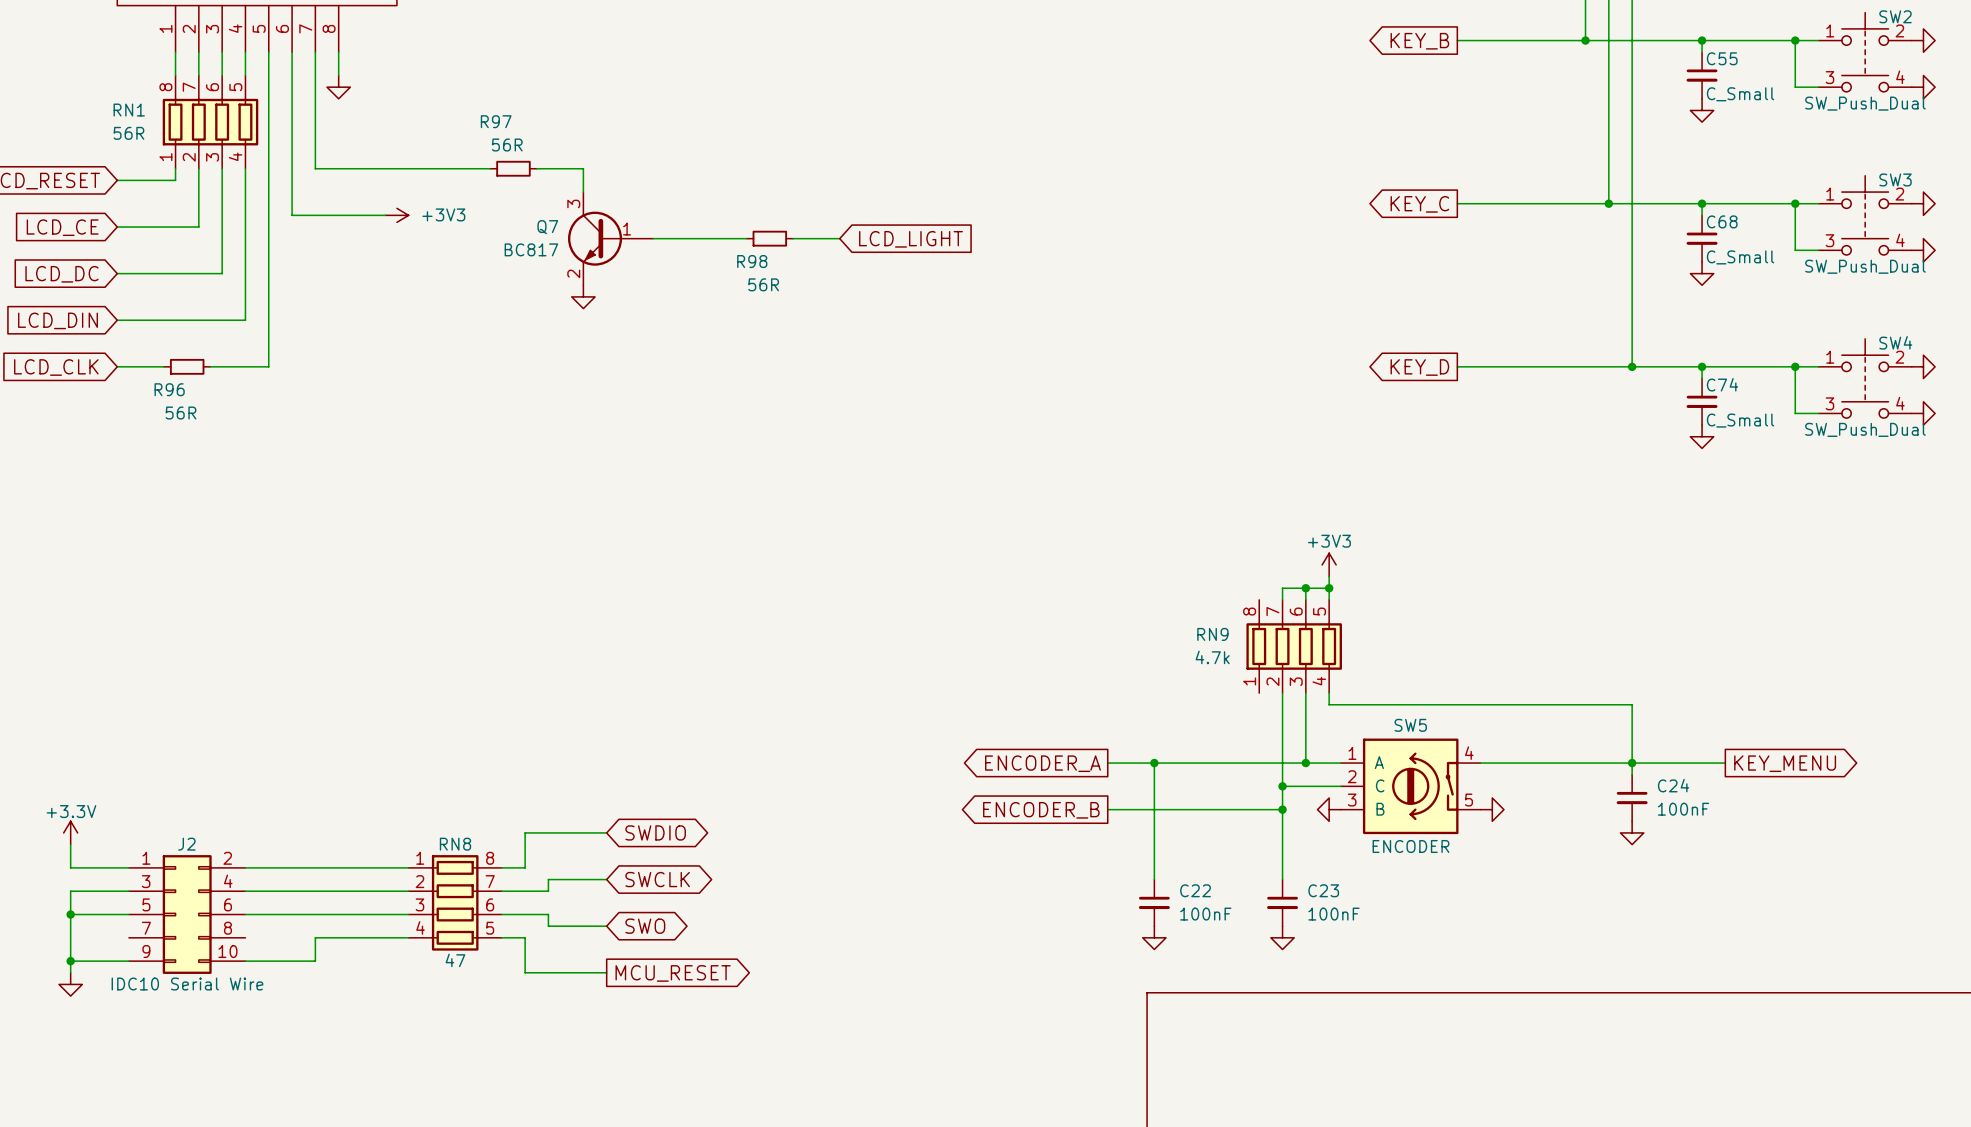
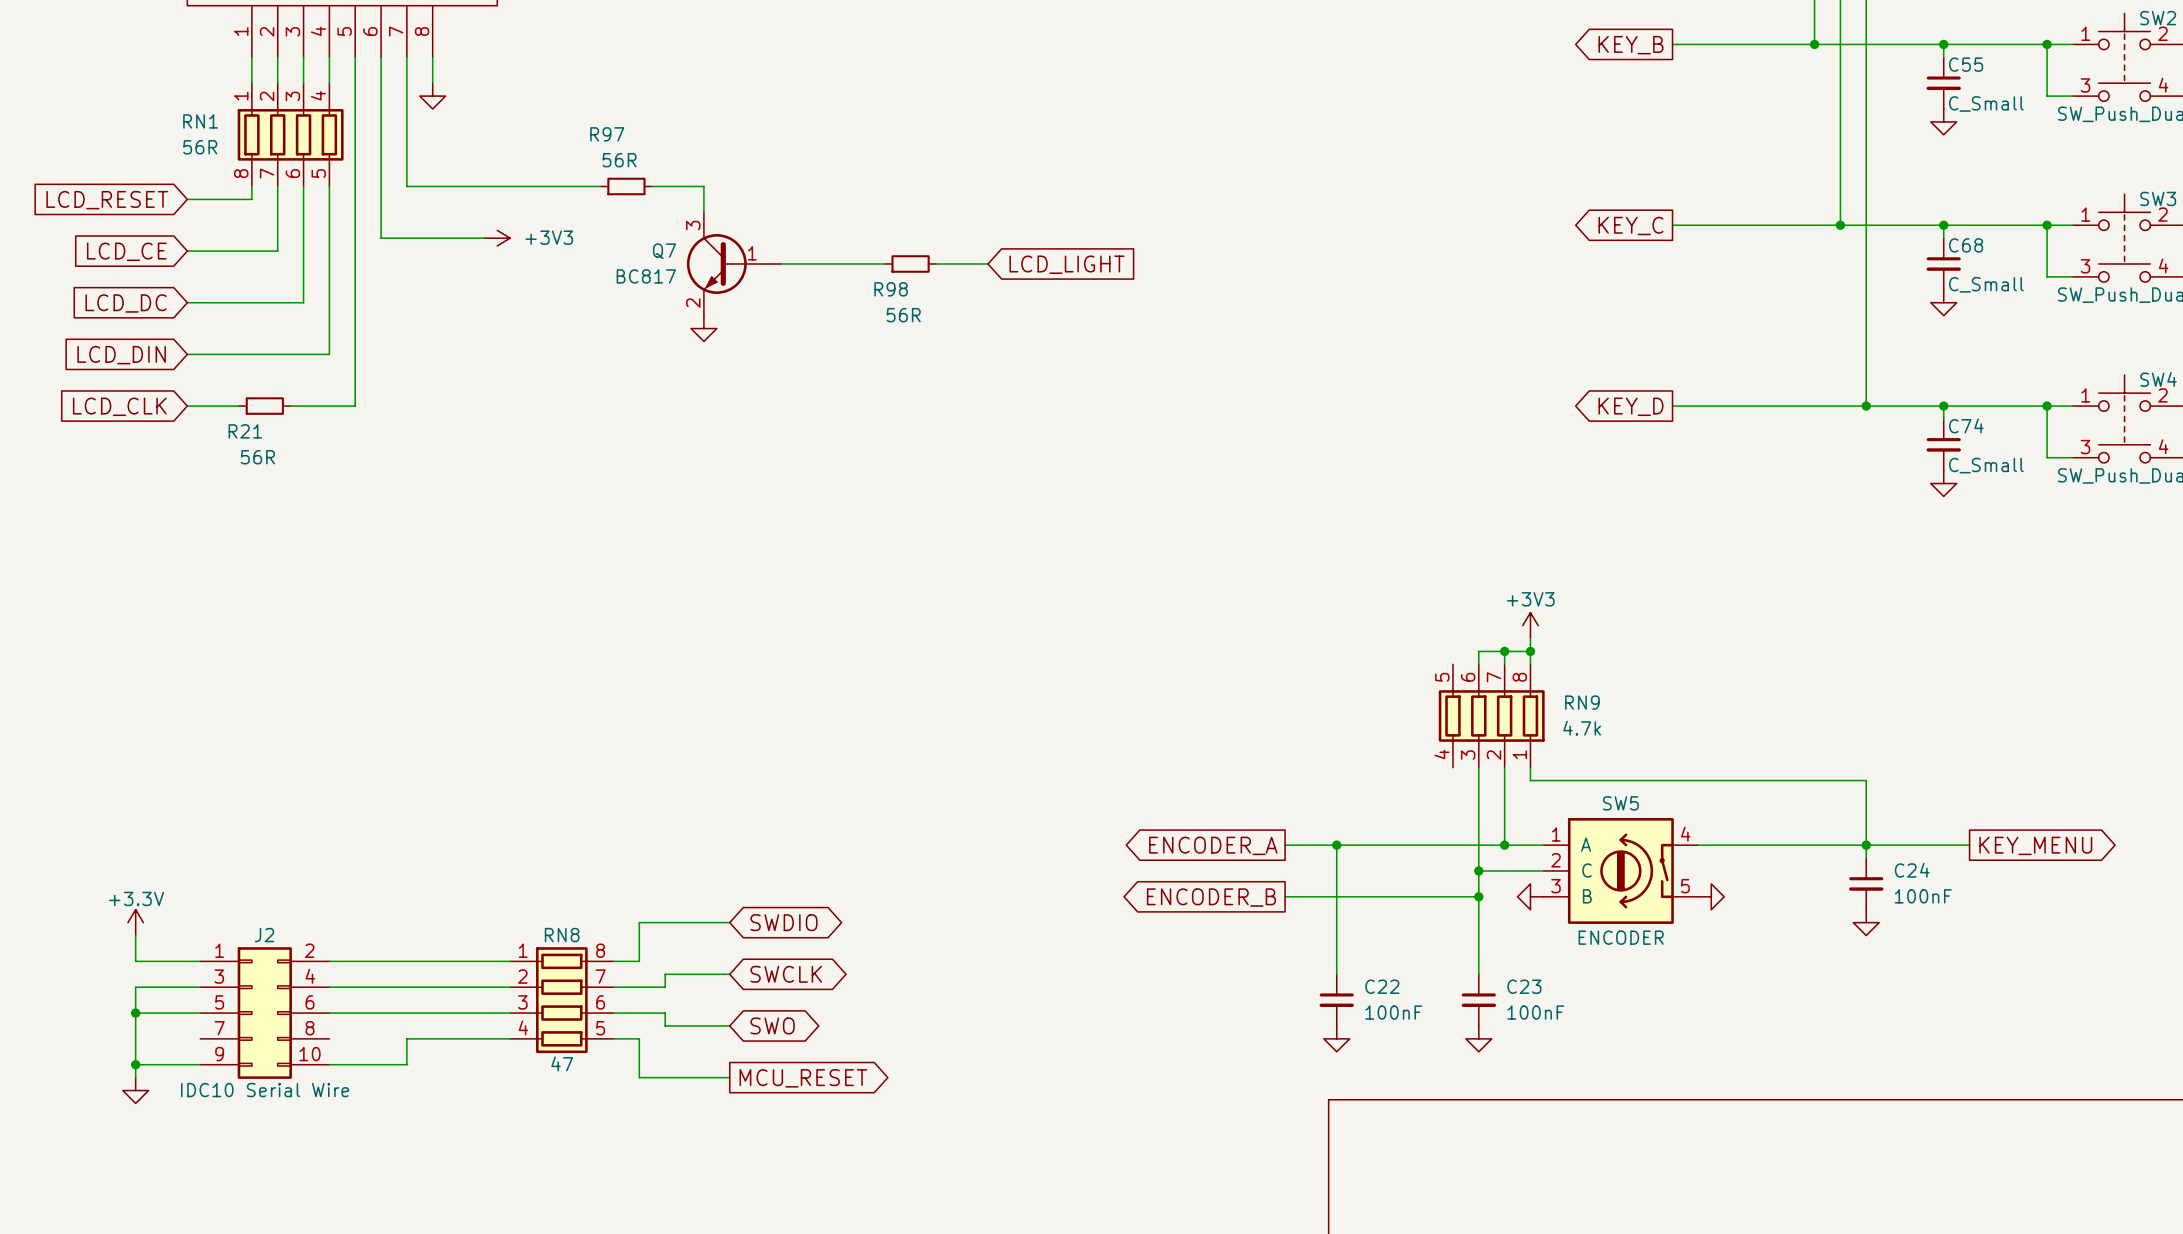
RN1 flip: as is (210, 122) -> up-down (290, 134)
R96 name: R96 (169, 389) -> R21 (245, 431)
RN9 flip: as is (1294, 646) -> left-right (1491, 716)

